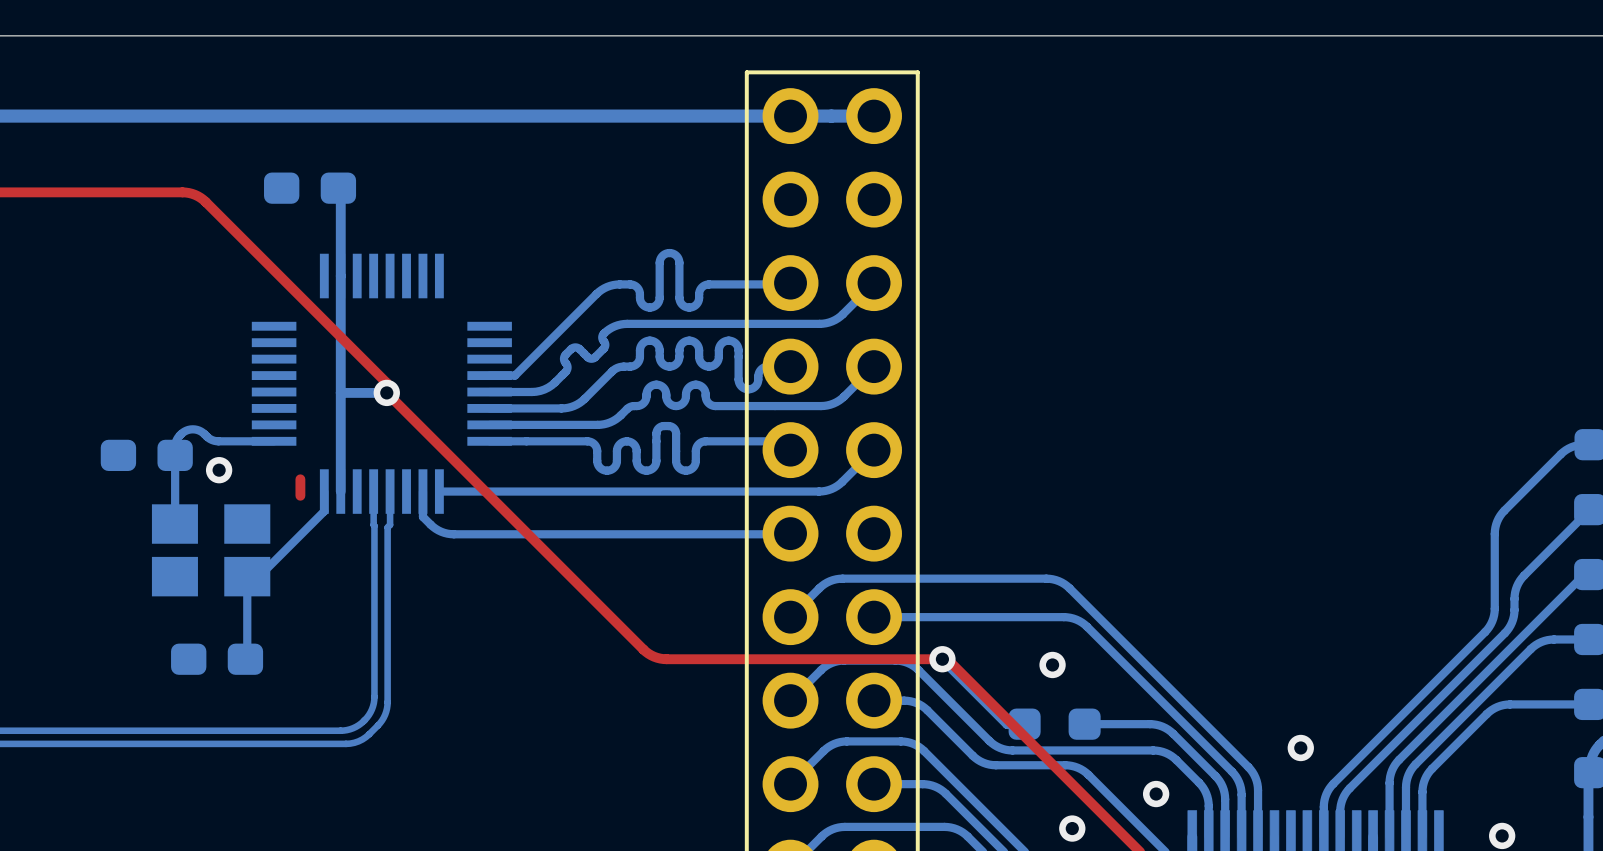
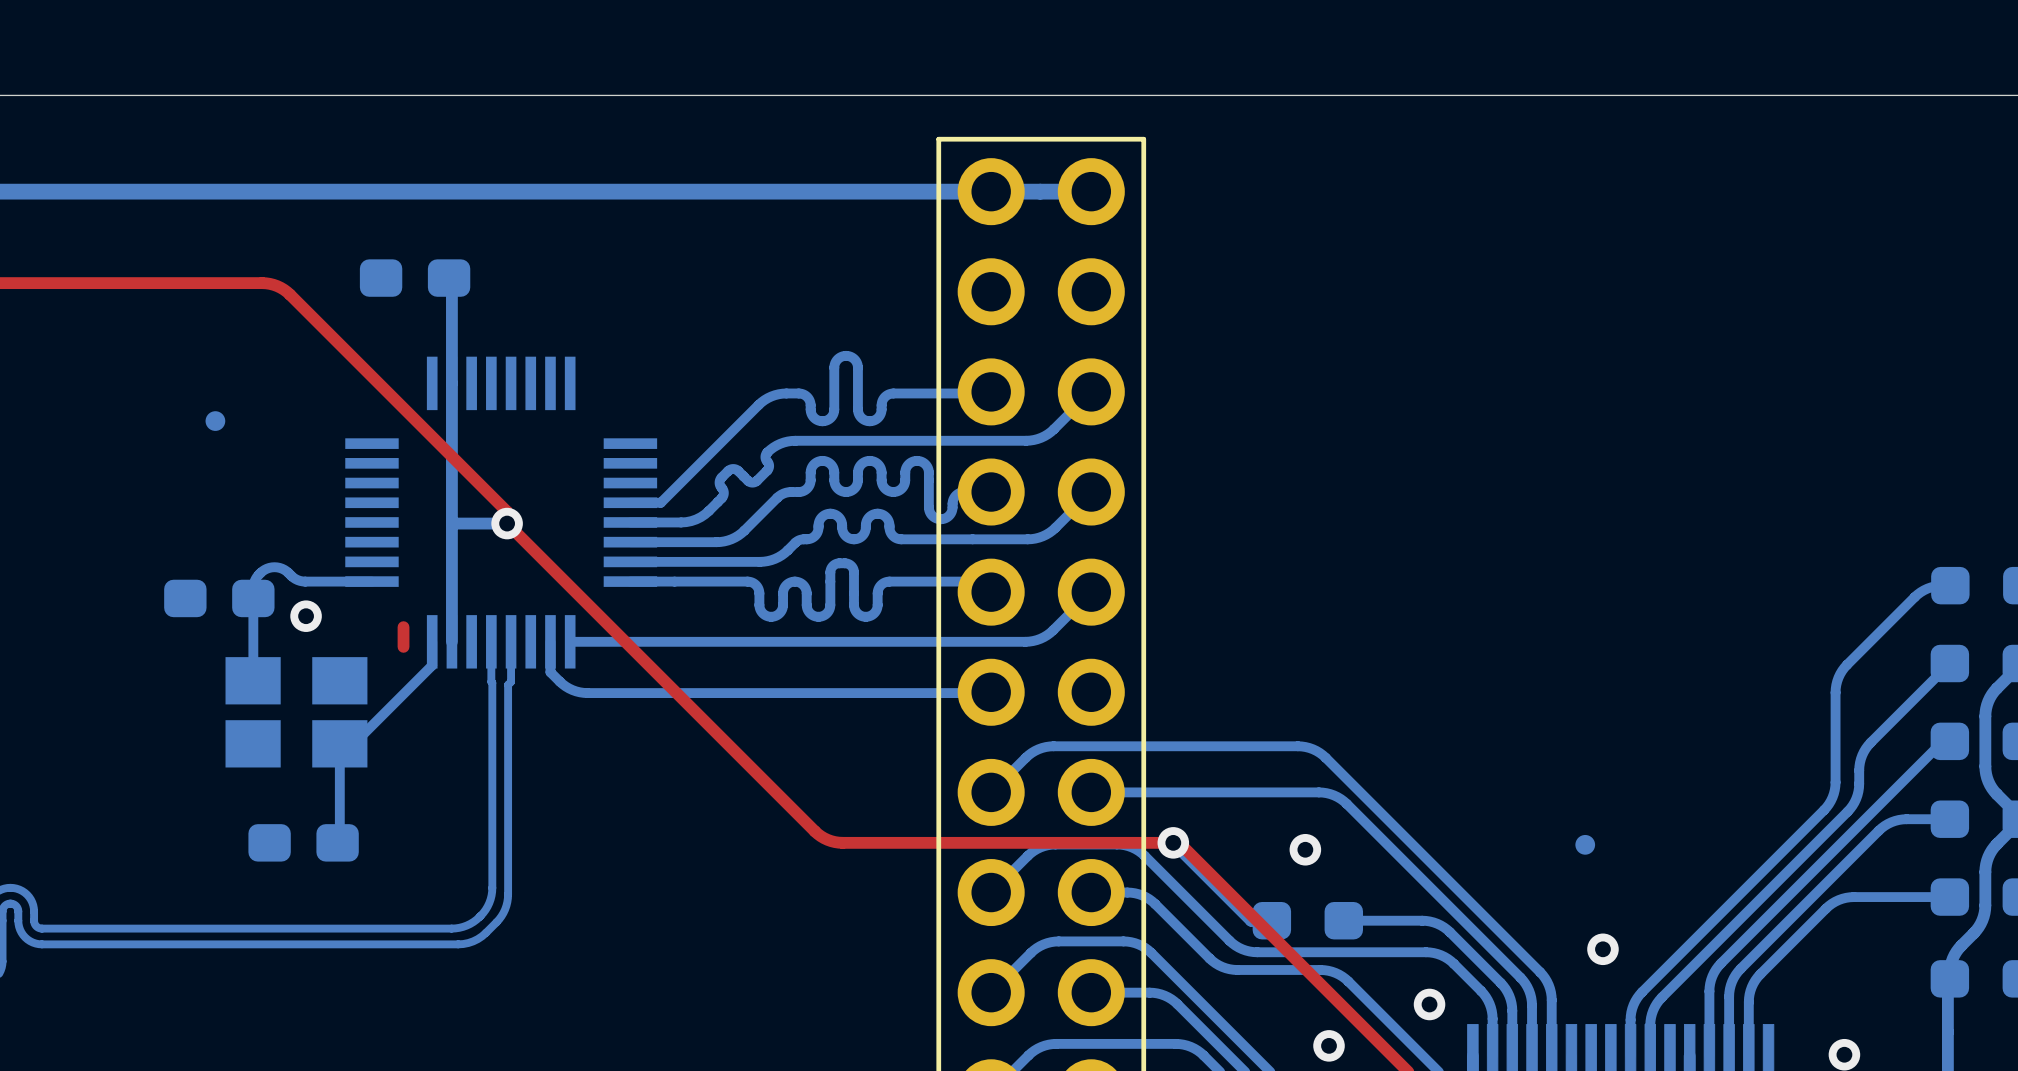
part: none -> (215, 421)
part: none -> (1585, 844)

